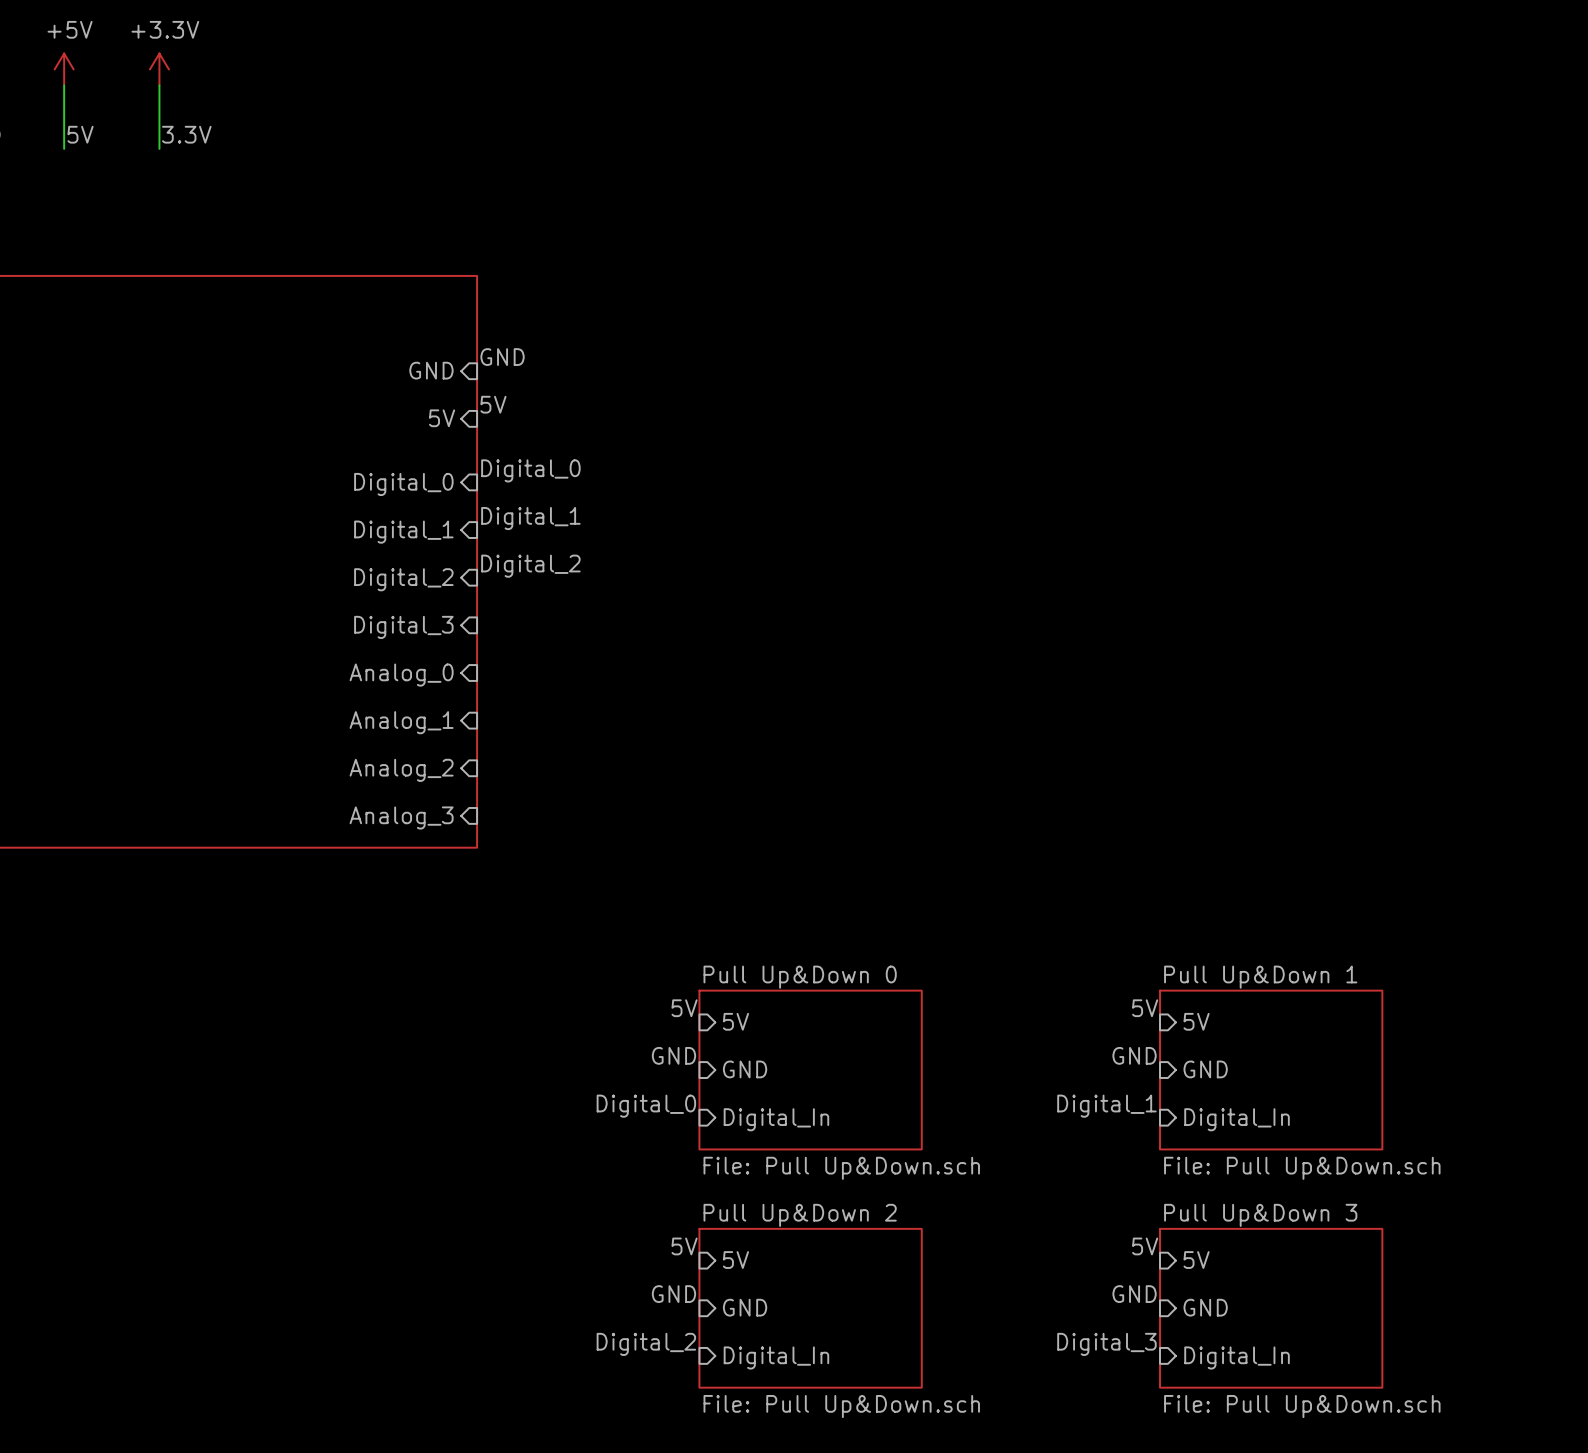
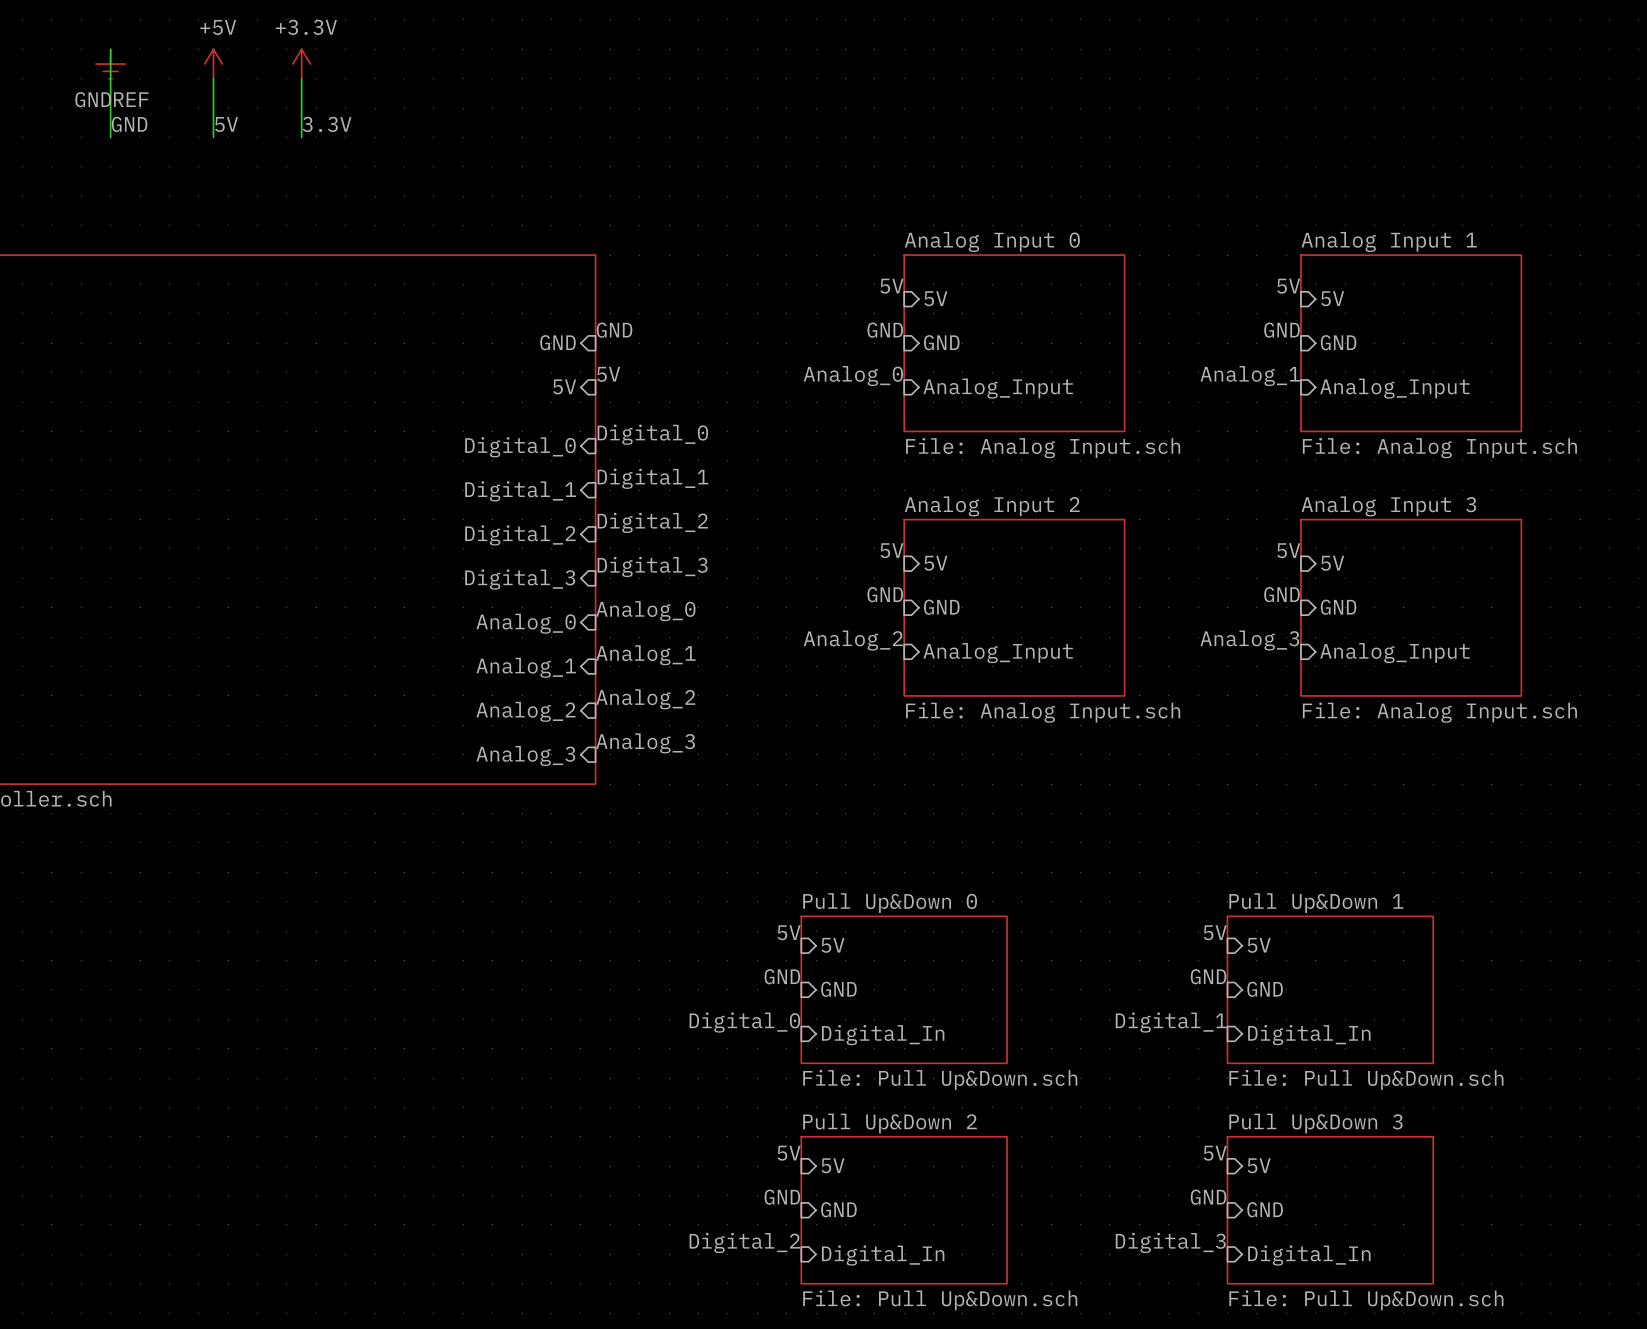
label: none -> 5V (891, 286)
label: none -> 5V (1288, 286)
sheet pin: none -> 5V (935, 298)
sheet pin: none -> 5V (1332, 298)
label: none -> GND (885, 330)
label: none -> GND (1282, 330)
sheet pin: none -> GND (941, 342)
sheet pin: none -> GND (1338, 342)
sheet Analog Input 0: none -> File: Analog Input.sch (1014, 343)
sheet Analog Input 1: none -> File: Analog Input.sch (1411, 343)
label: none -> Analog_0 (853, 376)
label: none -> Analog_1 (1250, 376)
sheet pin: none -> Analog_Input (998, 388)
sheet pin: none -> Analog_Input (1394, 388)
label: none -> 5V (891, 550)
label: none -> 5V (1288, 550)
sheet pin: none -> 5V (935, 563)
sheet pin: none -> 5V (1332, 563)
label: none -> Digital_3 (652, 566)
label: none -> GND (885, 594)
label: none -> GND (1282, 594)
sheet pin: none -> GND (941, 607)
sheet pin: none -> GND (1338, 607)
sheet Analog Input 2: none -> File: Analog Input.sch (1014, 607)
sheet Analog Input 3: none -> File: Analog Input.sch (1411, 607)
label: none -> Analog_0 (645, 611)
label: none -> Analog_2 (853, 640)
label: none -> Analog_3 (1249, 640)
sheet pin: none -> Analog_Input (998, 653)
sheet pin: none -> Analog_Input (1394, 653)
label: none -> Analog_1 (645, 655)
label: none -> Analog_2 (645, 699)
label: none -> Analog_3 (645, 743)

